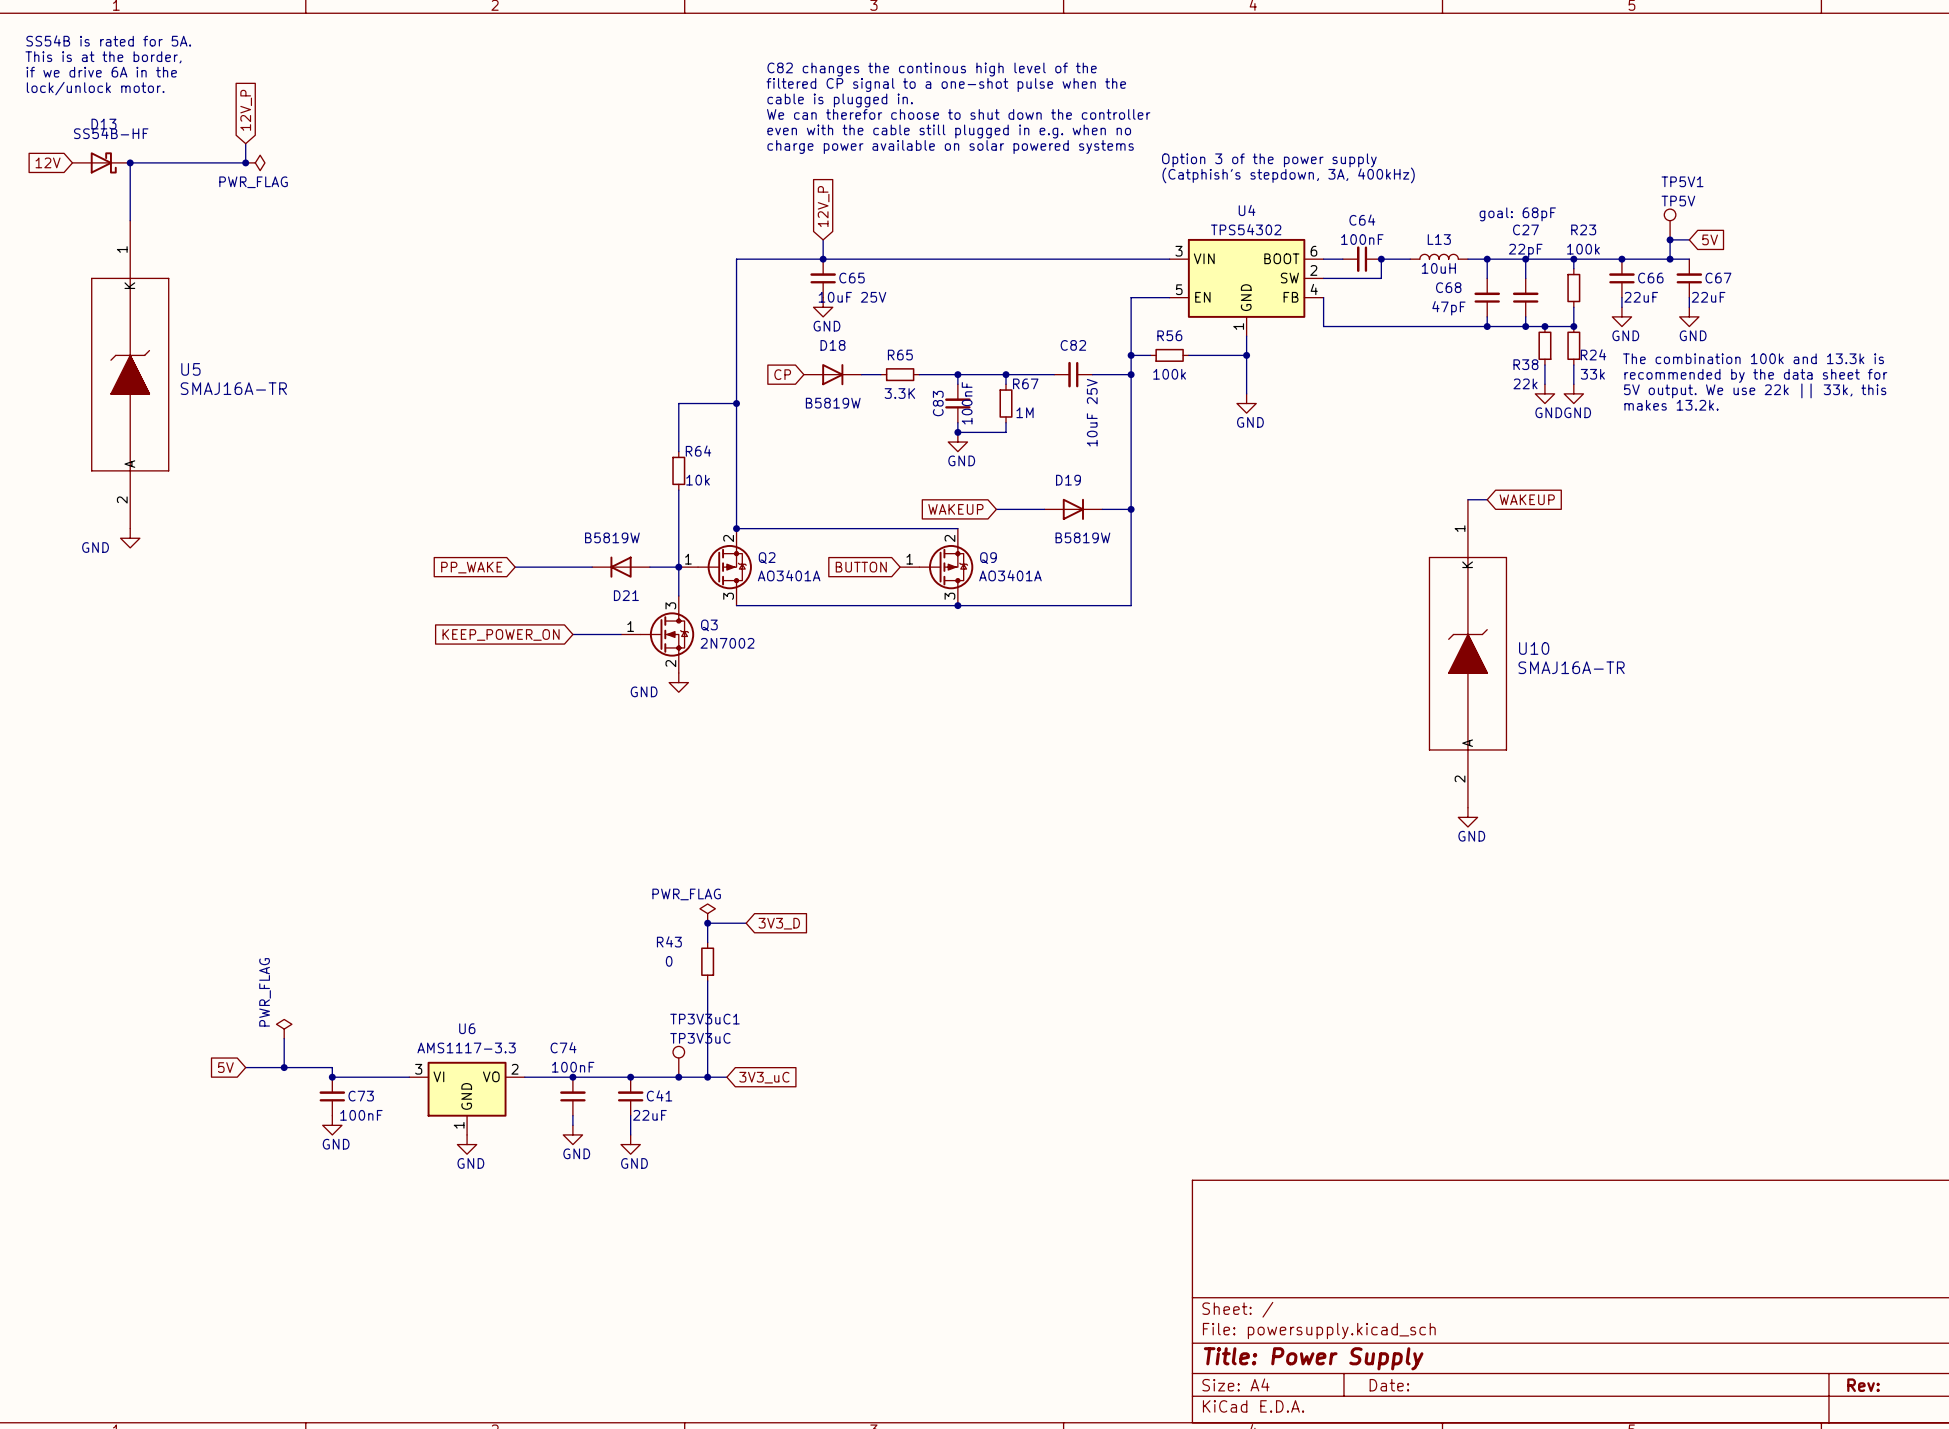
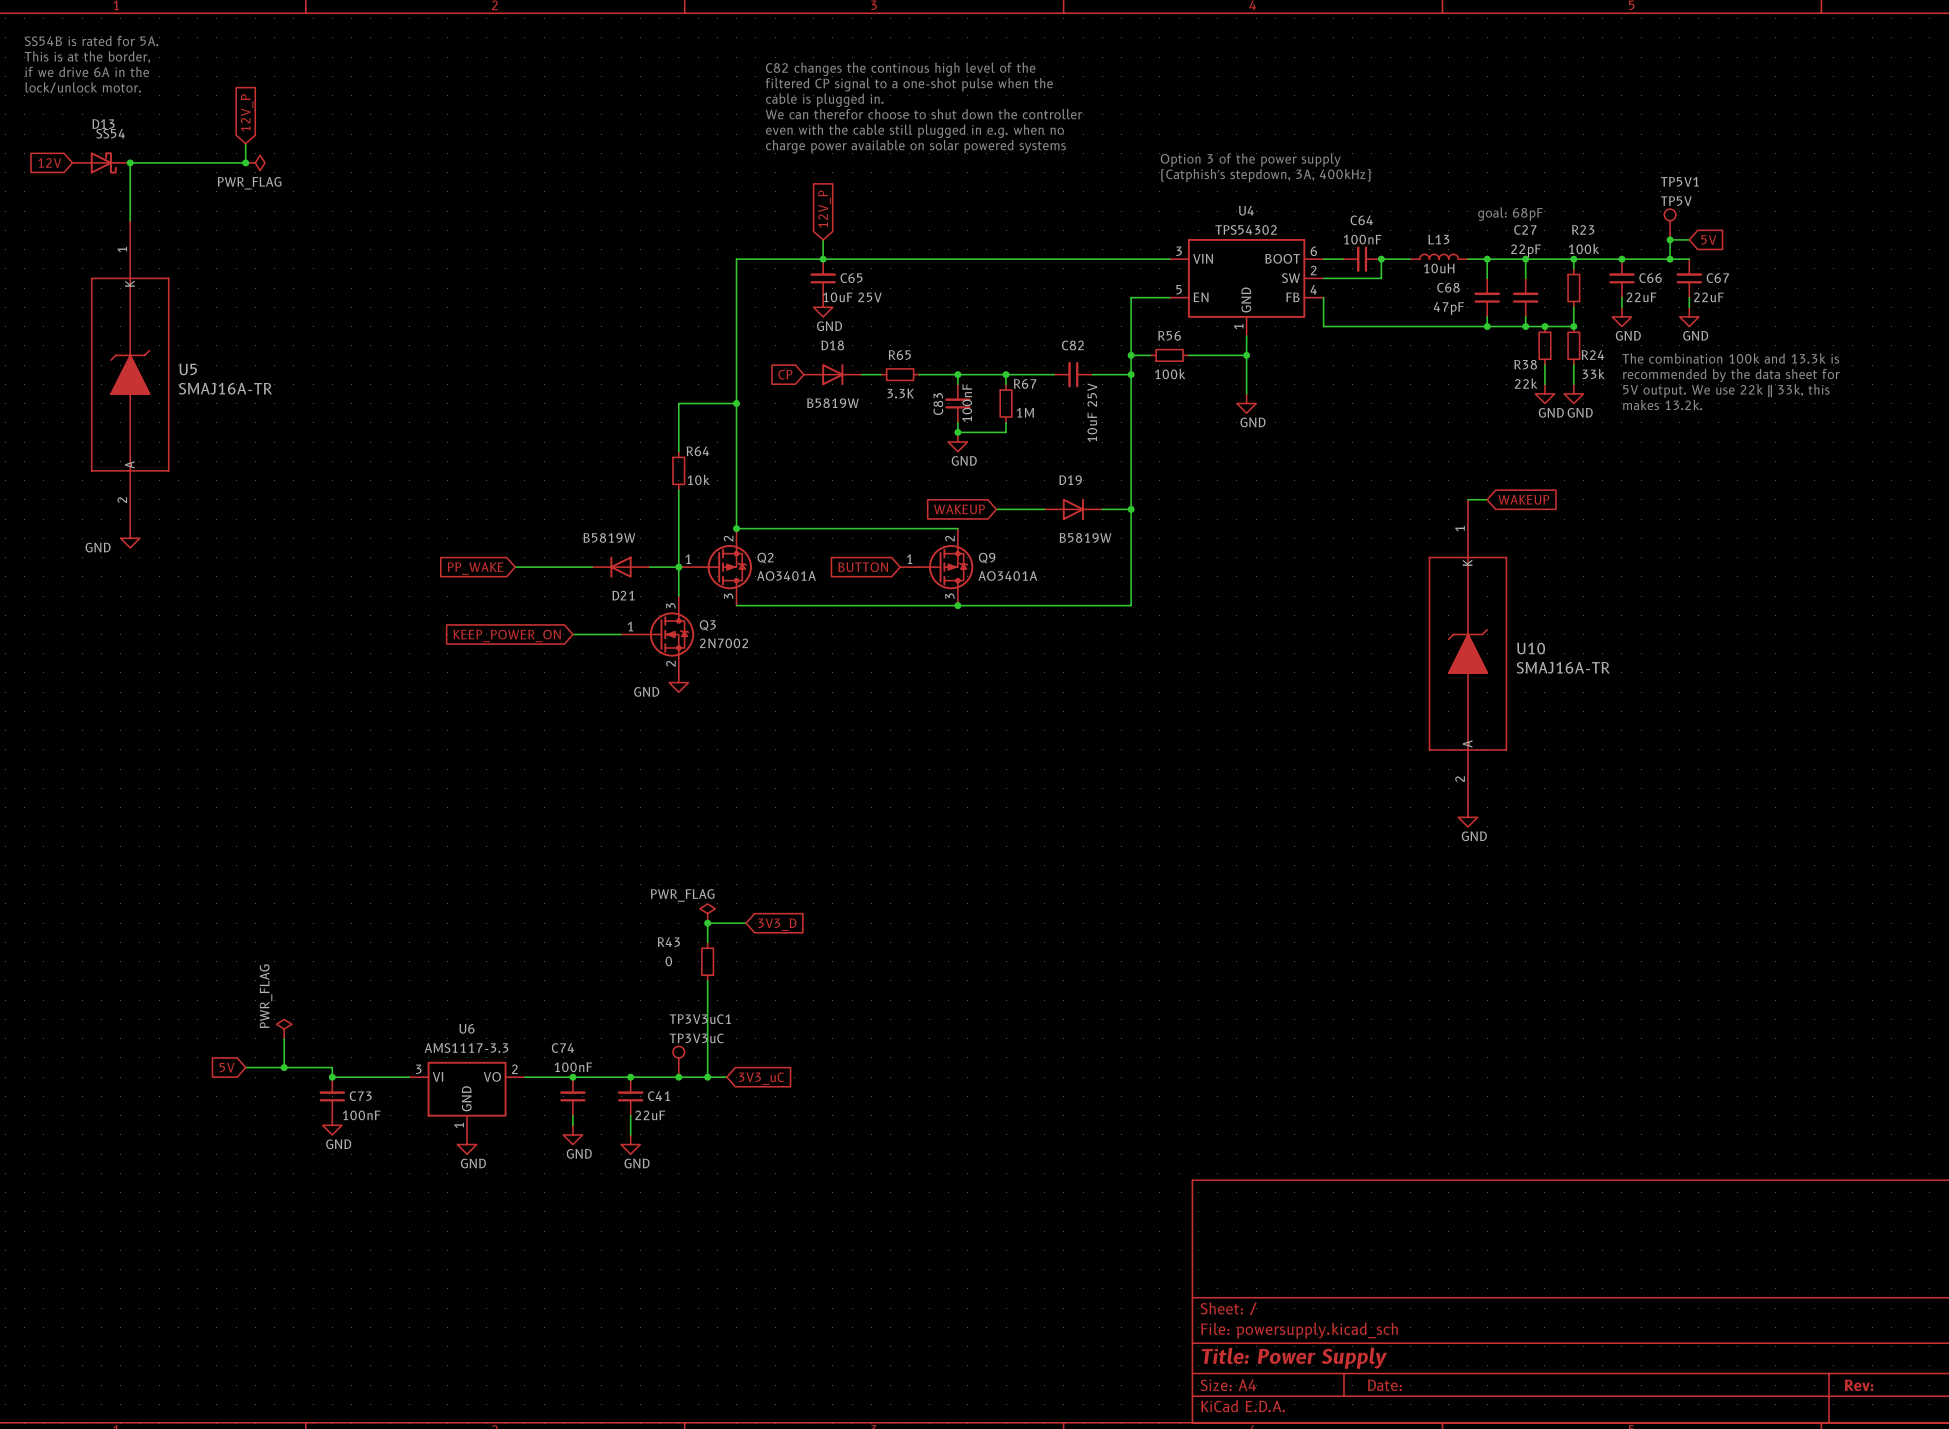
D13 value: SS54B-HF (111, 133) -> SS54 (110, 133)

